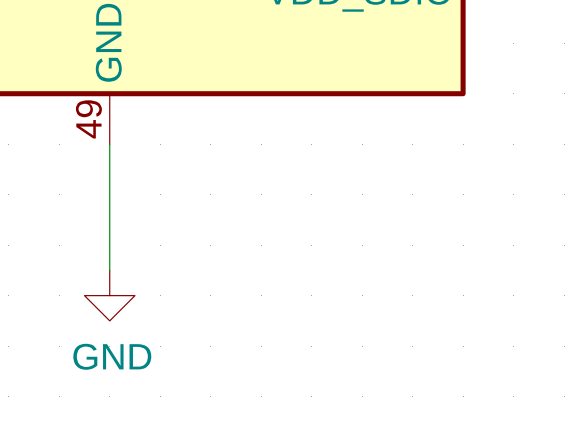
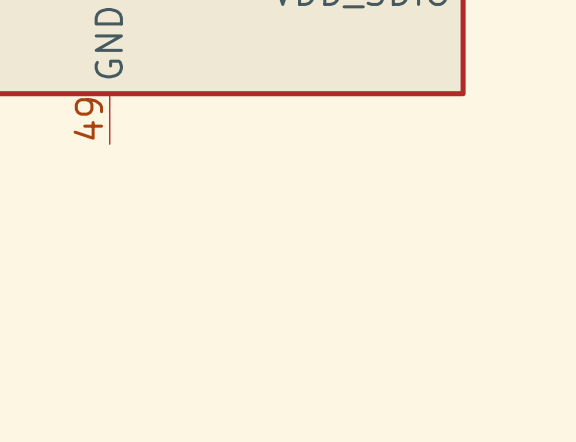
wire: (109, 144) (109, 270) -> none
power symbol: GND (109, 295) -> none

